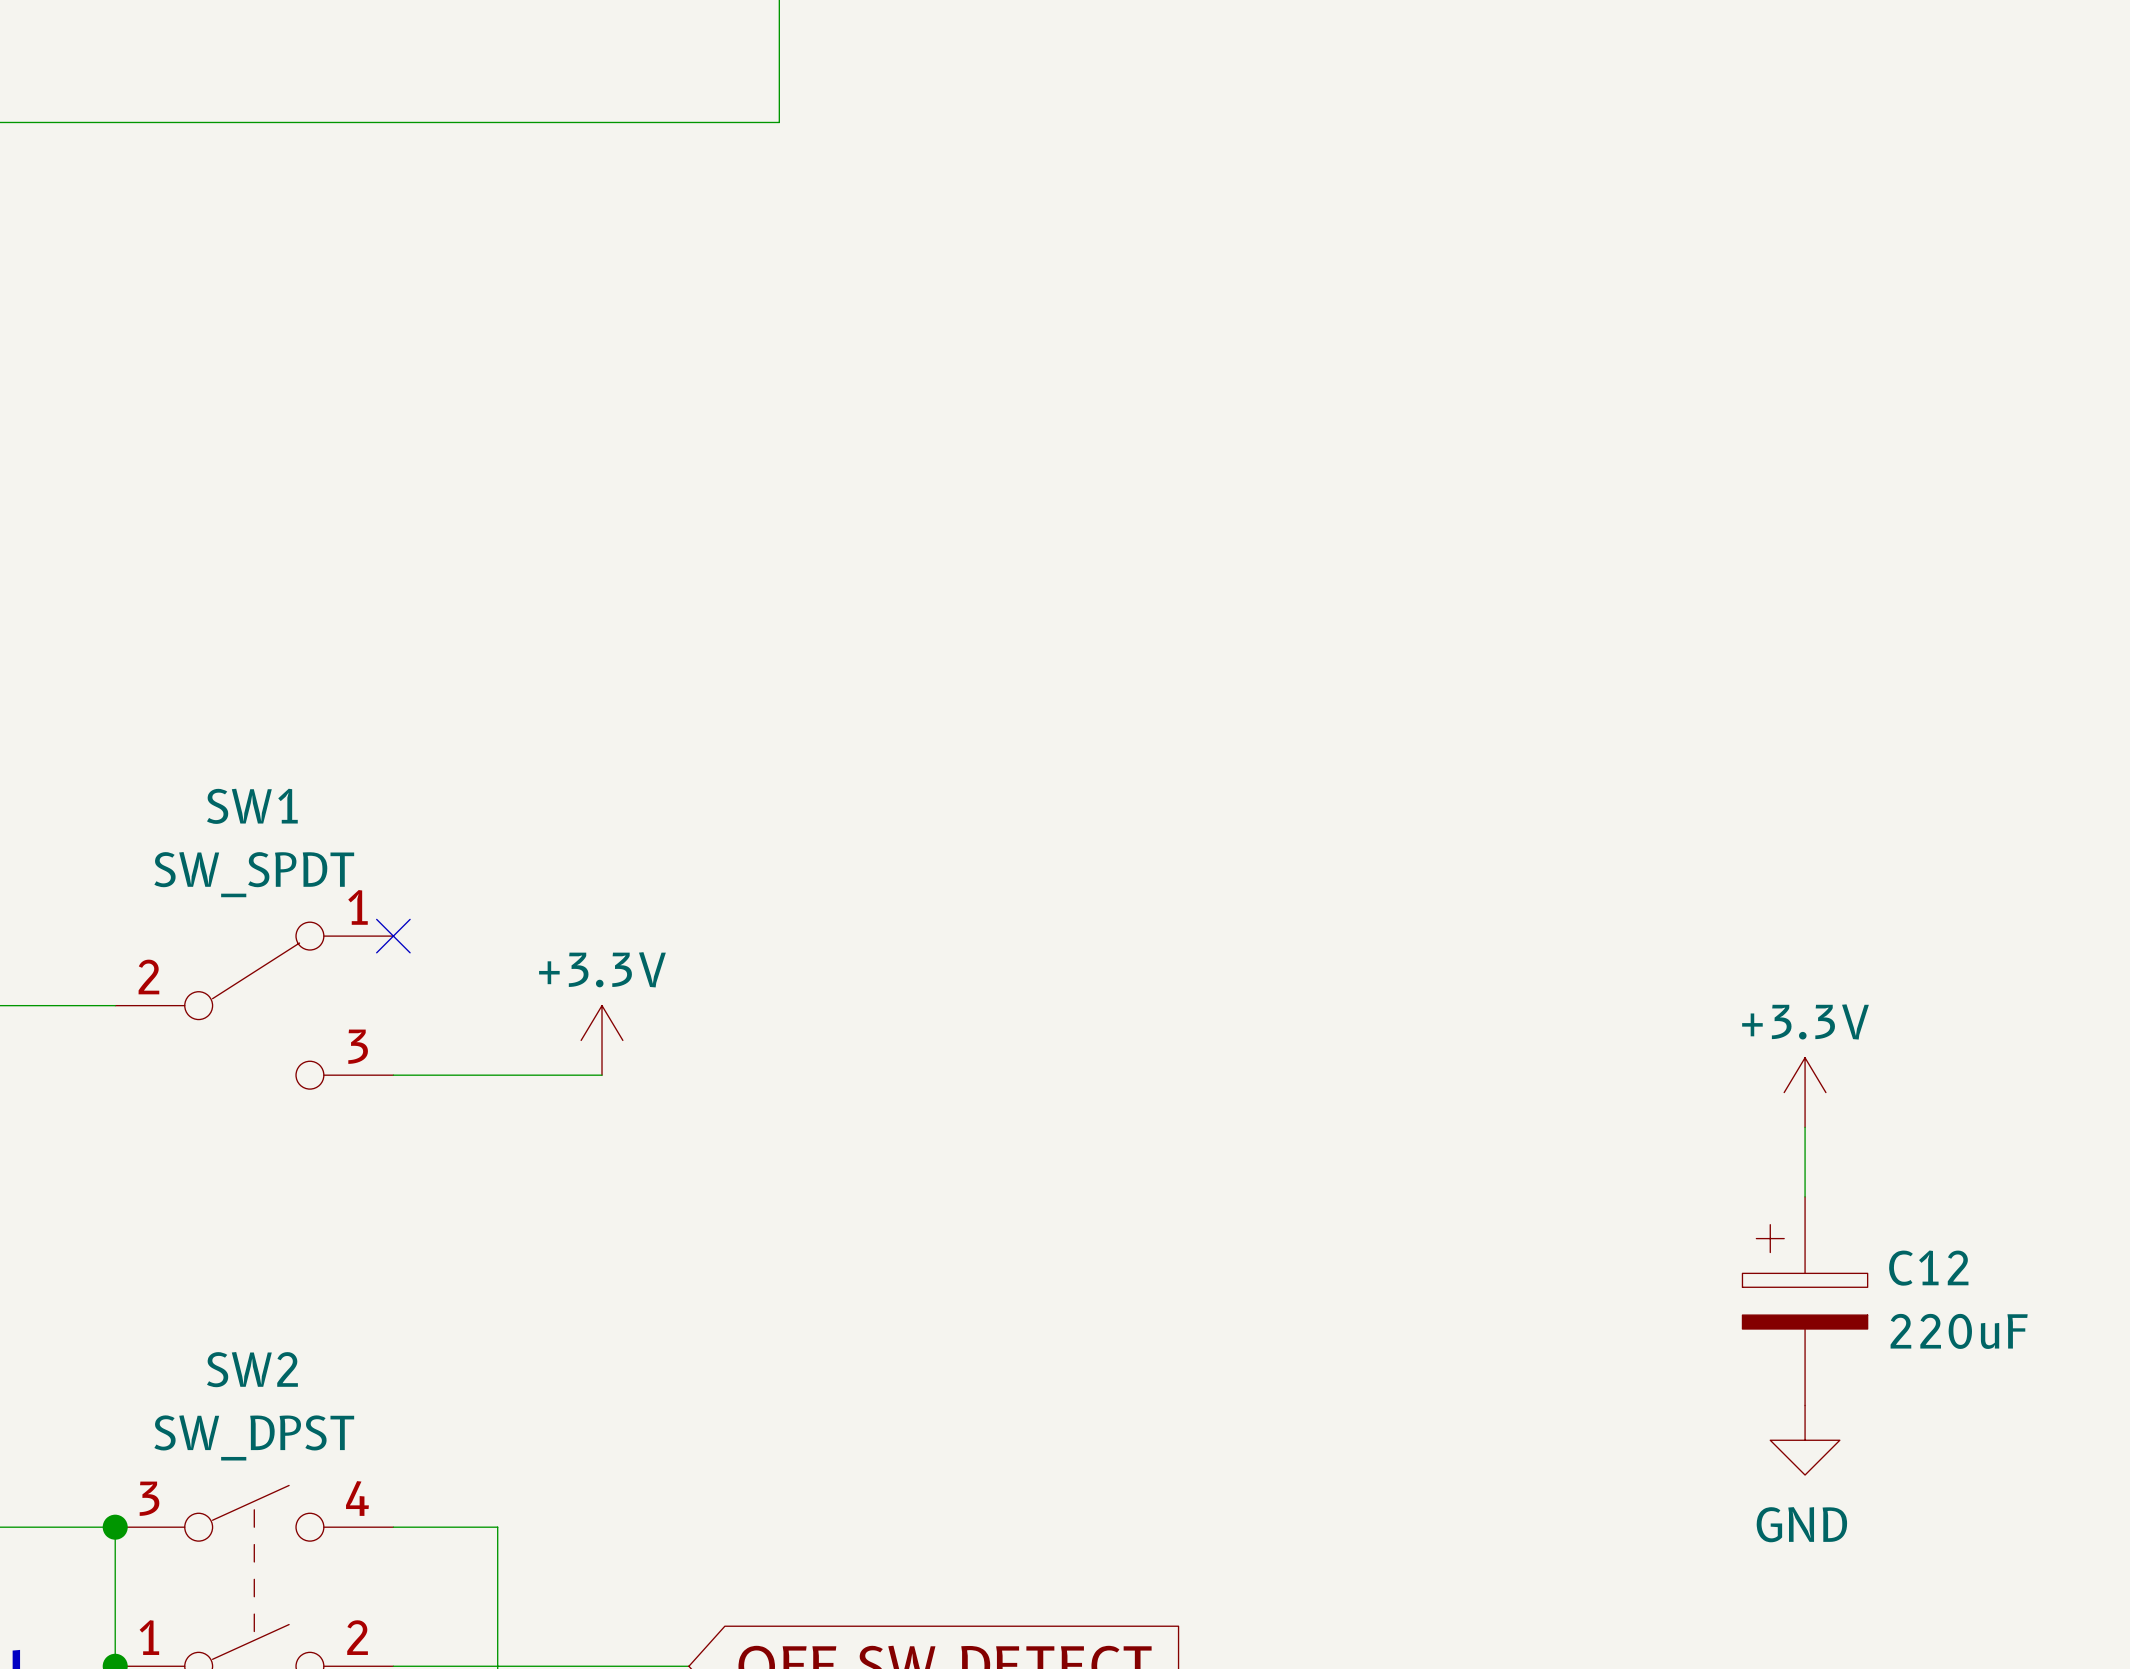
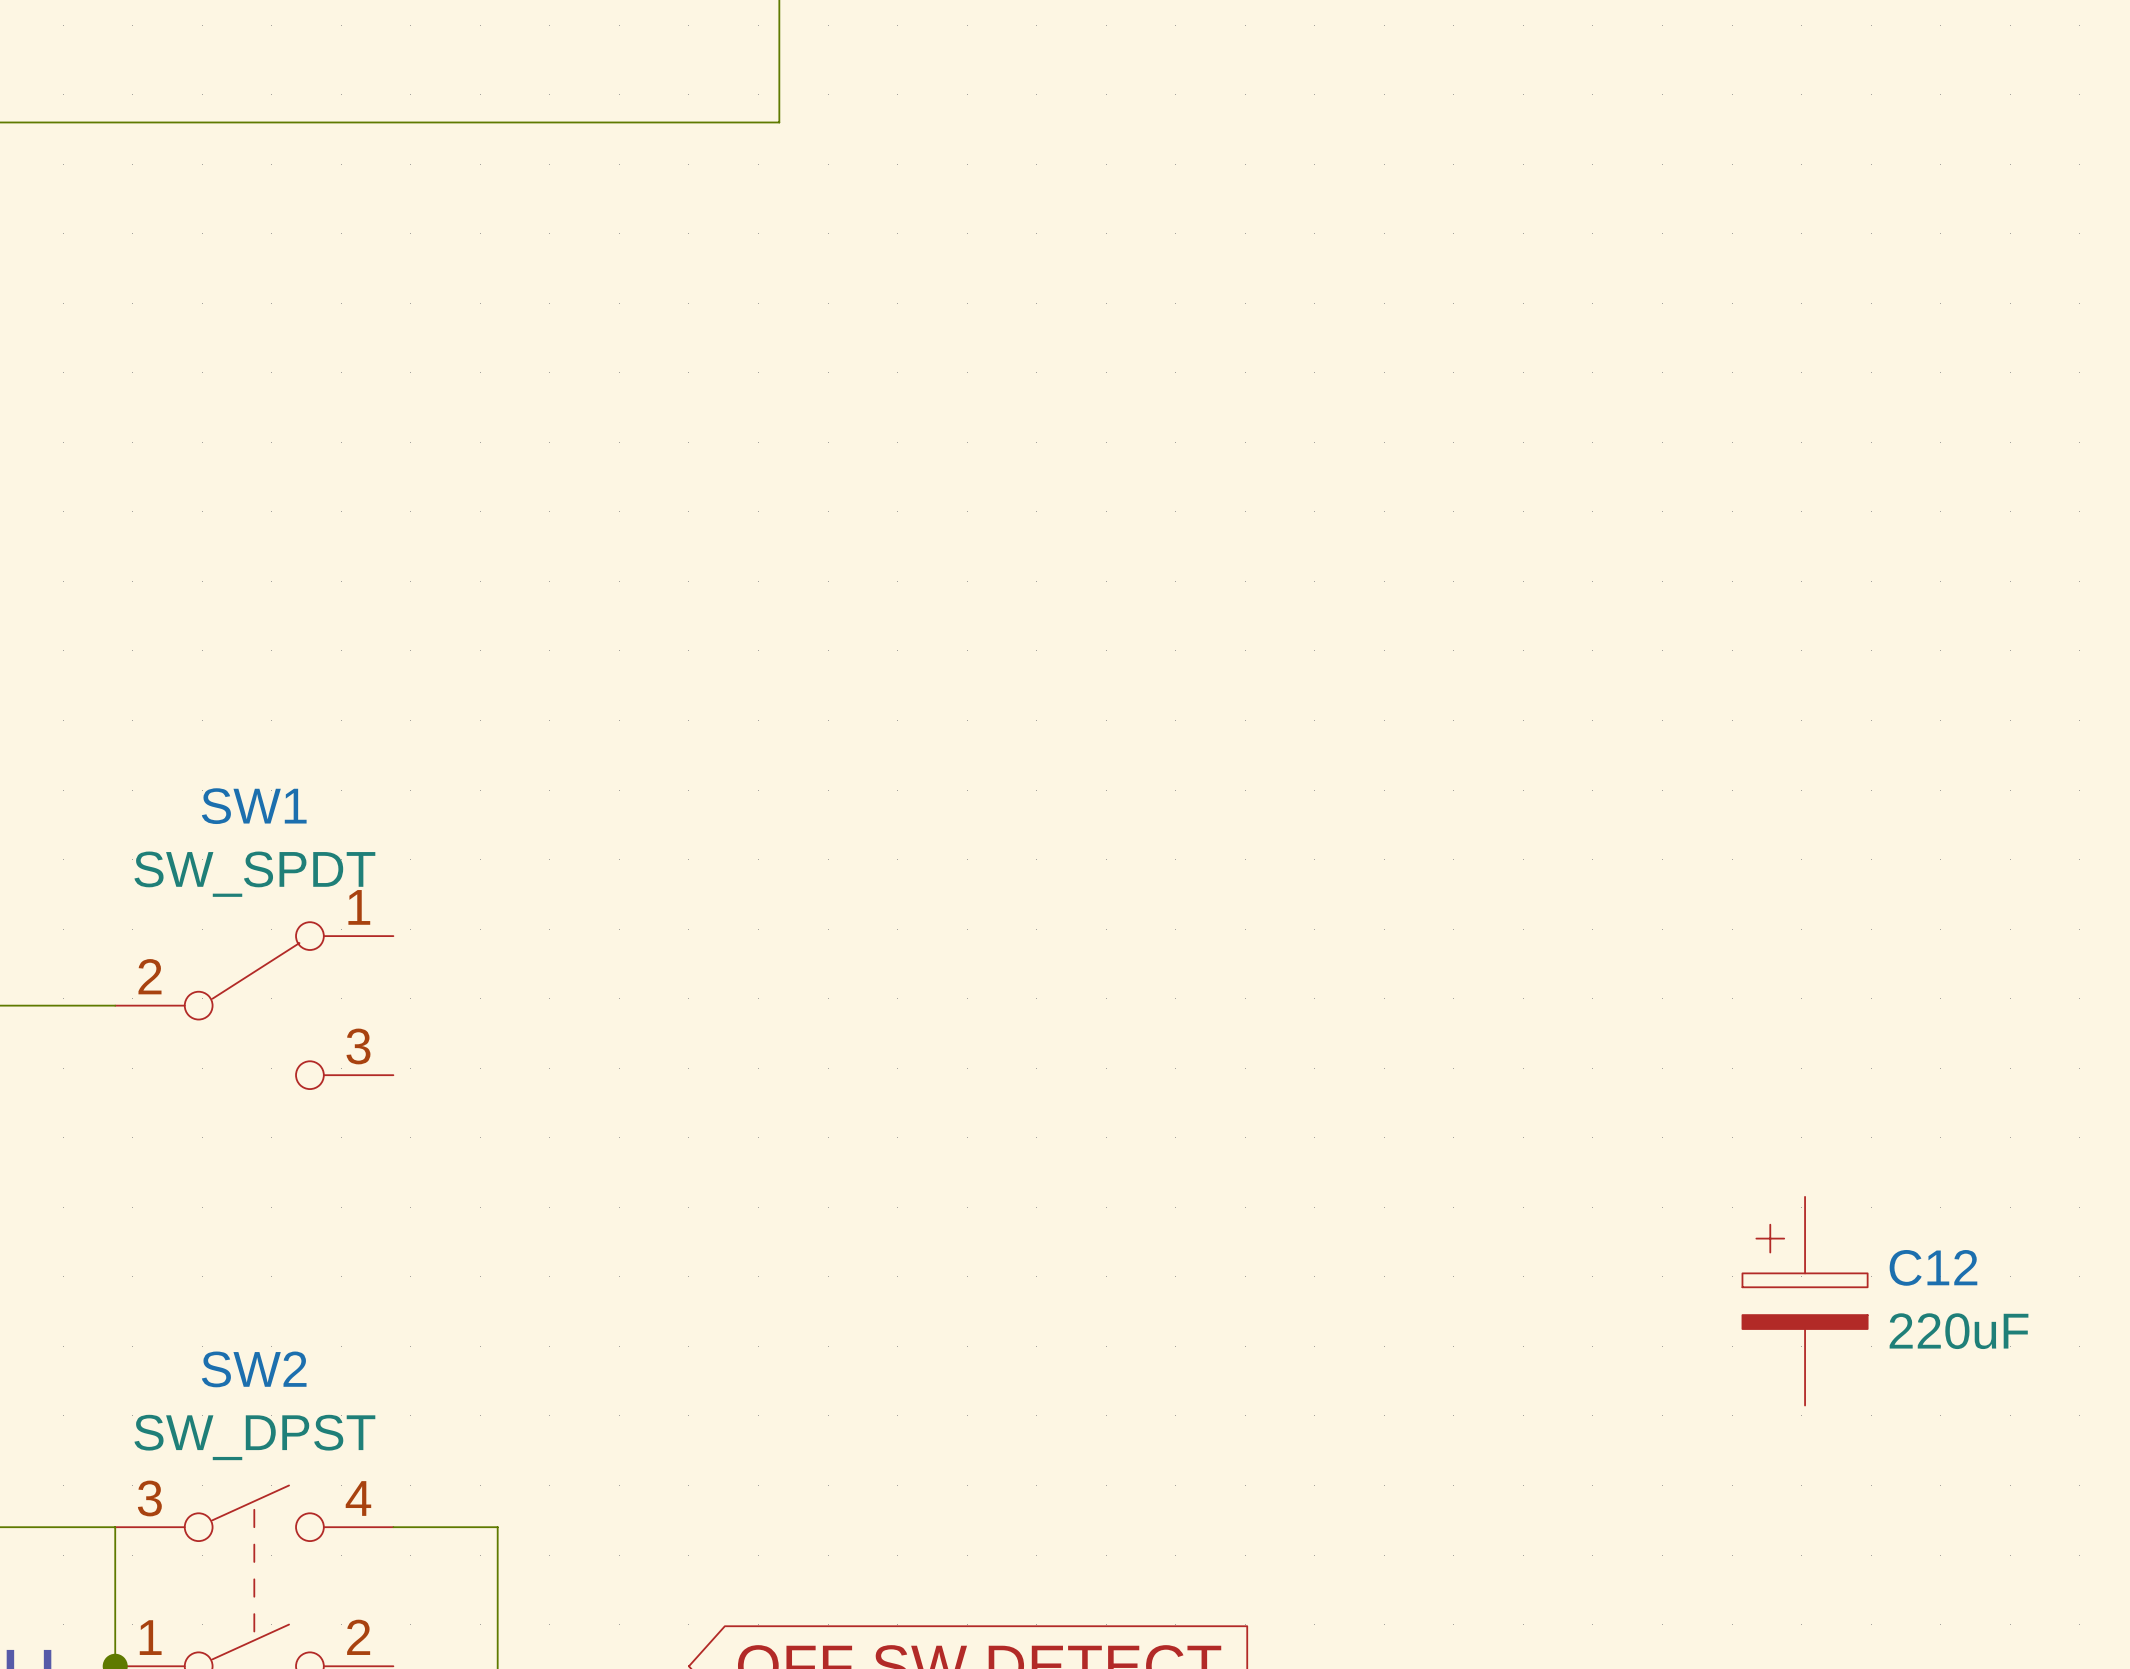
no-connect mark: (393, 936) -> none
power symbol: +3.3V (602, 1040) -> none
wire: (393, 1075) (602, 1075) -> none
power symbol: +3.3V (1805, 1092) -> none
wire: (1805, 1127) (1805, 1196) -> none
power symbol: GND (1805, 1440) -> none
junction: (115, 1527) -> none
wire: (393, 1666) (688, 1666) -> none

